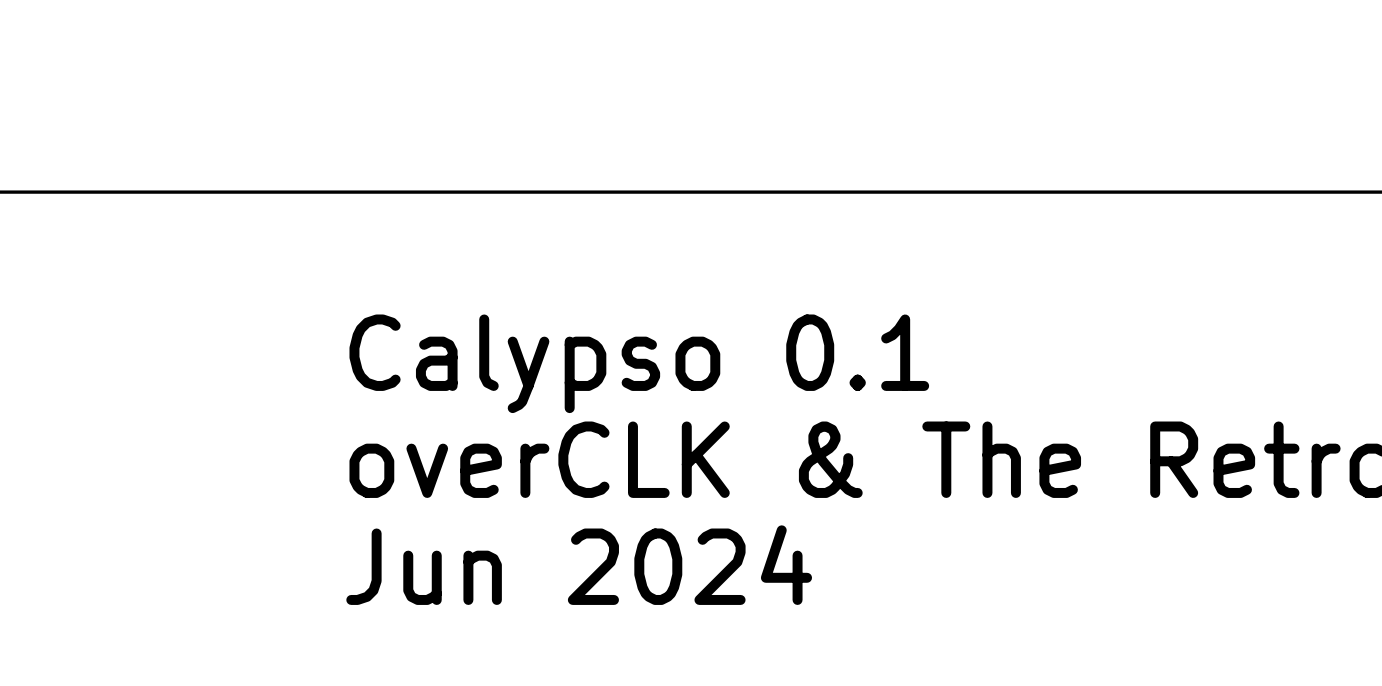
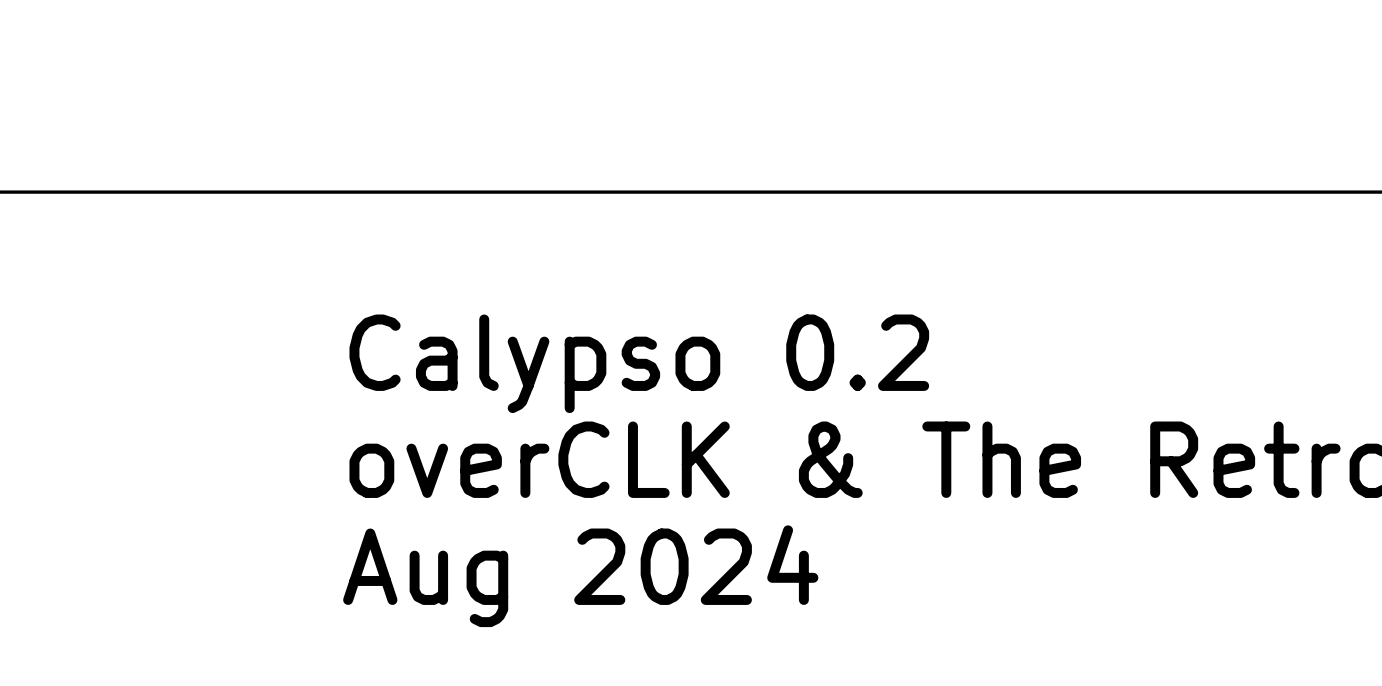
text: Calypso 0.1 (639, 363) -> Calypso 0.2 (639, 363)
text: Jun 2024 (579, 565) -> Aug 2024 (580, 576)

